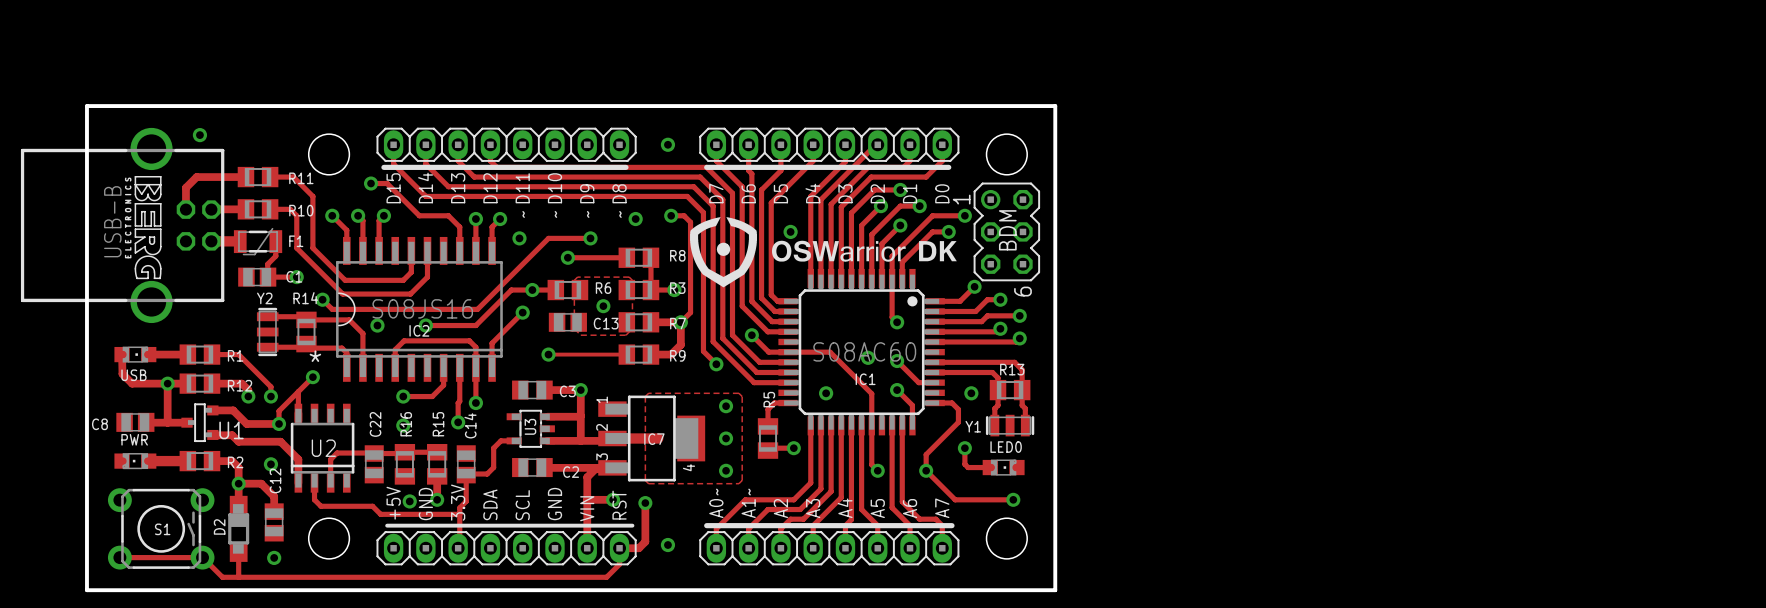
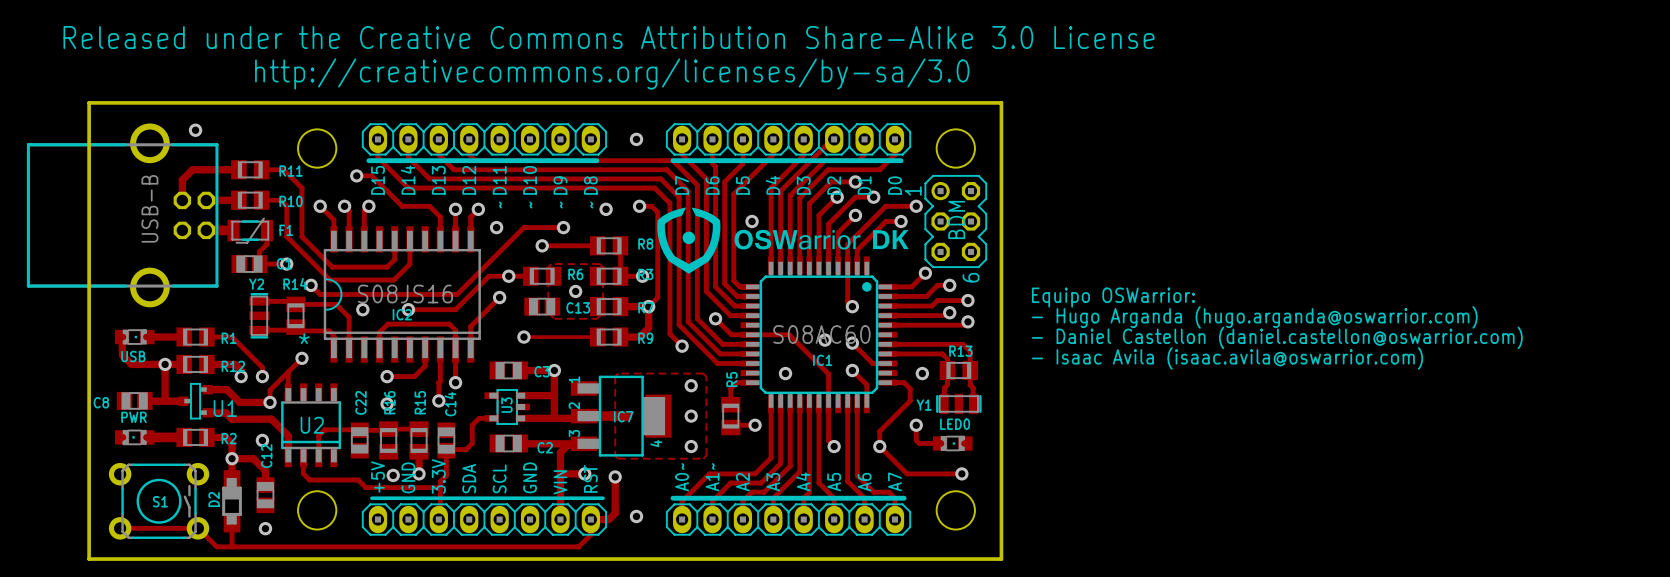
text: none -> Released under the Creative Commons Attribution Share-Alike 3.0 License (609, 37)
text: none -> http://creativecommons.org/licenses/by-sa/3.0 (612, 74)
part footprint: [20, 127, 225, 324] -> [26, 123, 219, 308]
part value position: USB-B (112, 221) -> USB-B (149, 208)
text: none -> Equipo OSWarrior: (1113, 297)
text: none -> - Hugo Arganda (hugo.arganda@oswarrior.com) (1254, 317)
text: none -> - Daniel Castellon (daniel.castellon@oswarrior.com) (1277, 337)
text: none -> - Isaac Avila (isaac.avila@oswarrior.com) (1227, 358)

